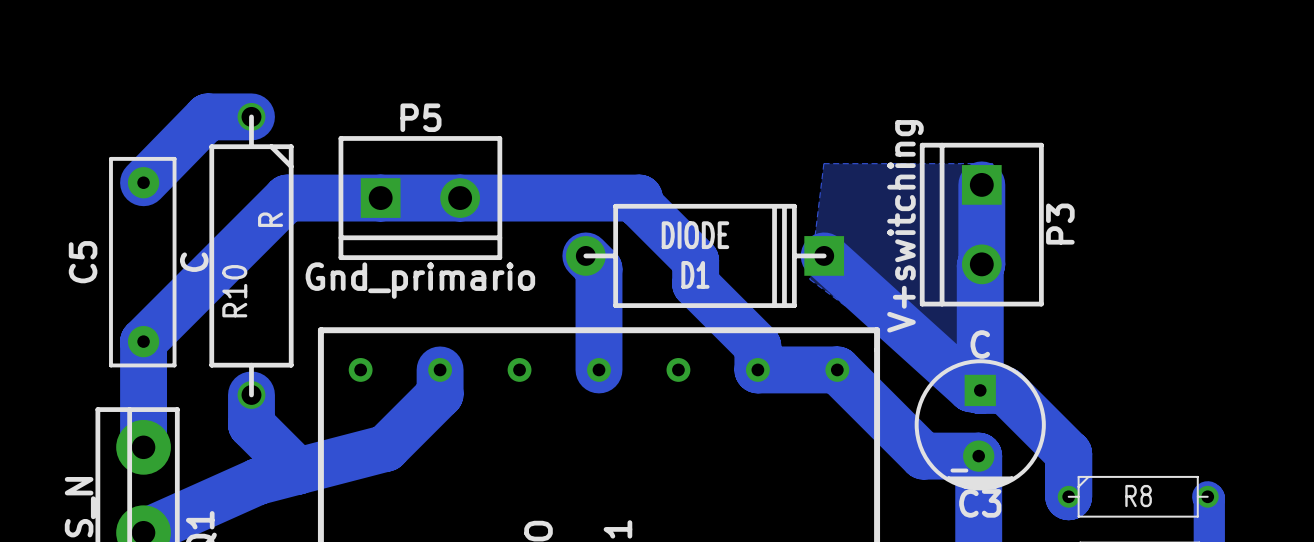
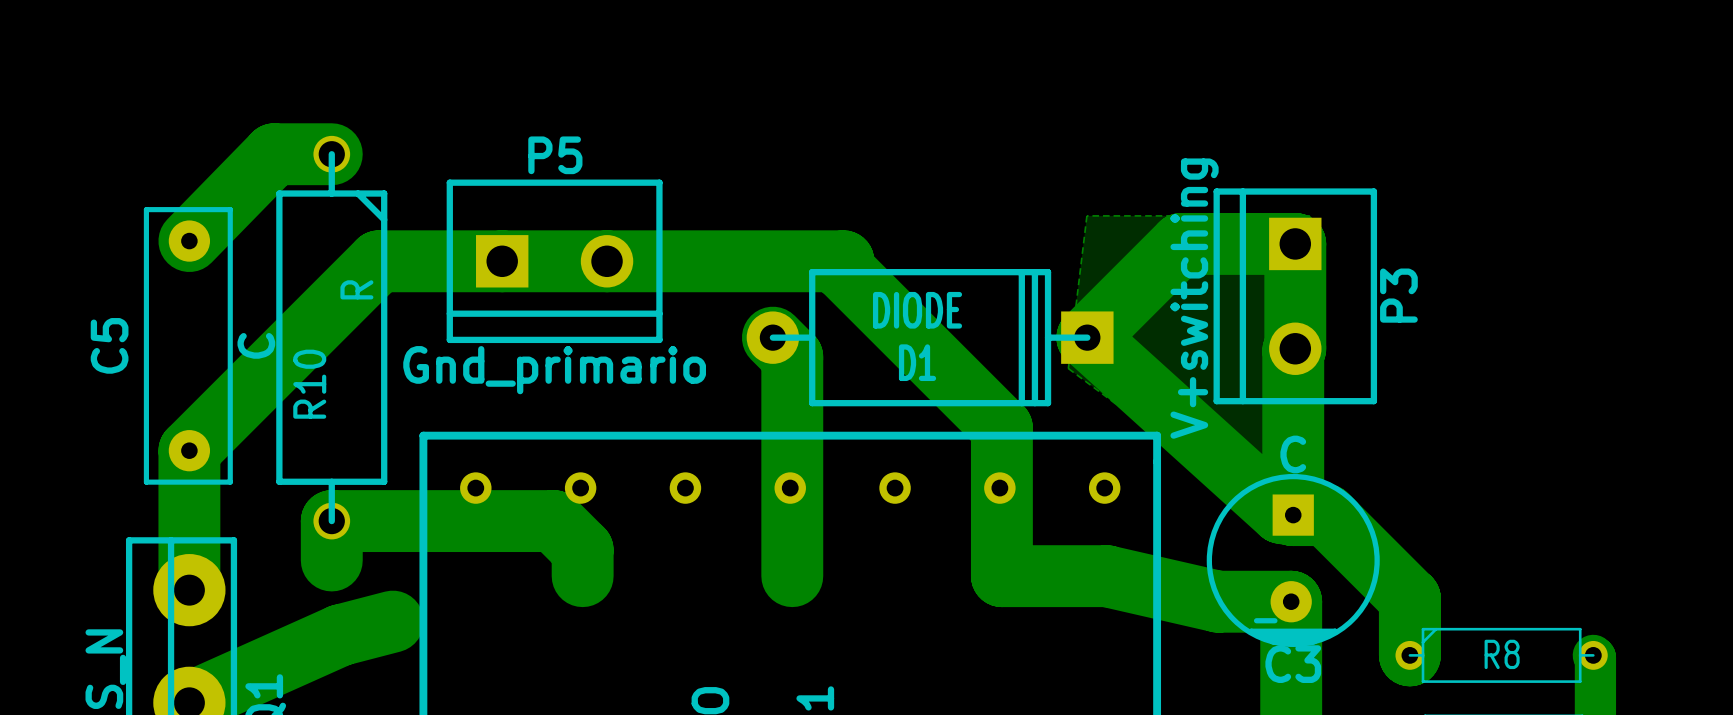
bottom track: none -> (1295, 243) (1181, 243) (1087, 337)
bottom track: (695, 260) (695, 284) (757, 346) (757, 369) (837, 369) (923, 456) -> (917, 343) (1001, 428) (1001, 576) (1106, 576) (1218, 601)
bottom track: (598, 269) (598, 369) -> (790, 354) (792, 357) (792, 576)
bottom track: (440, 369) (440, 394) (385, 448) (297, 471) (251, 424) -> none
bottom track: none -> (331, 521) (553, 521) (582, 549) (582, 576)

